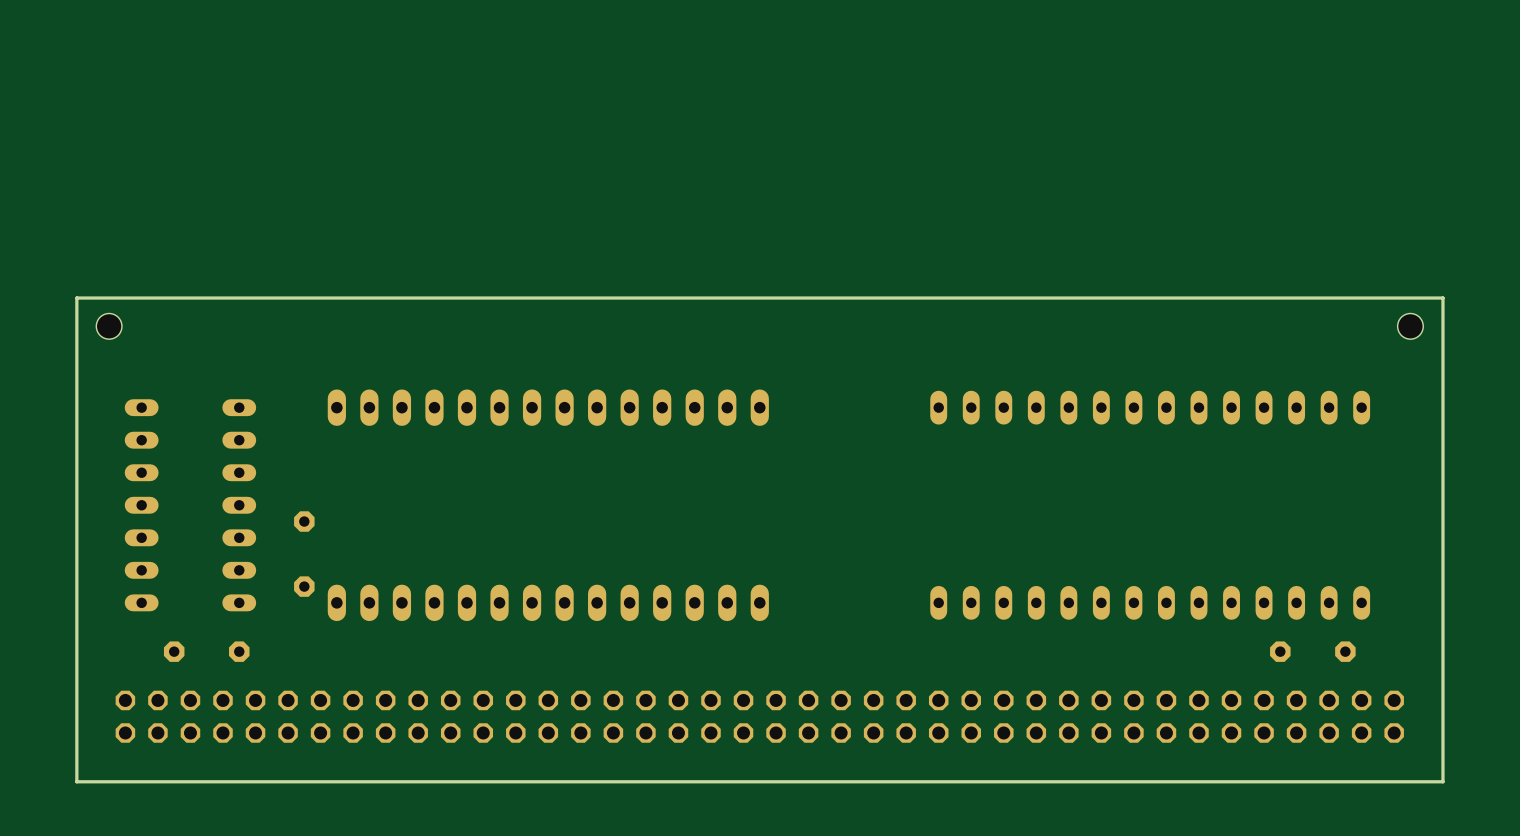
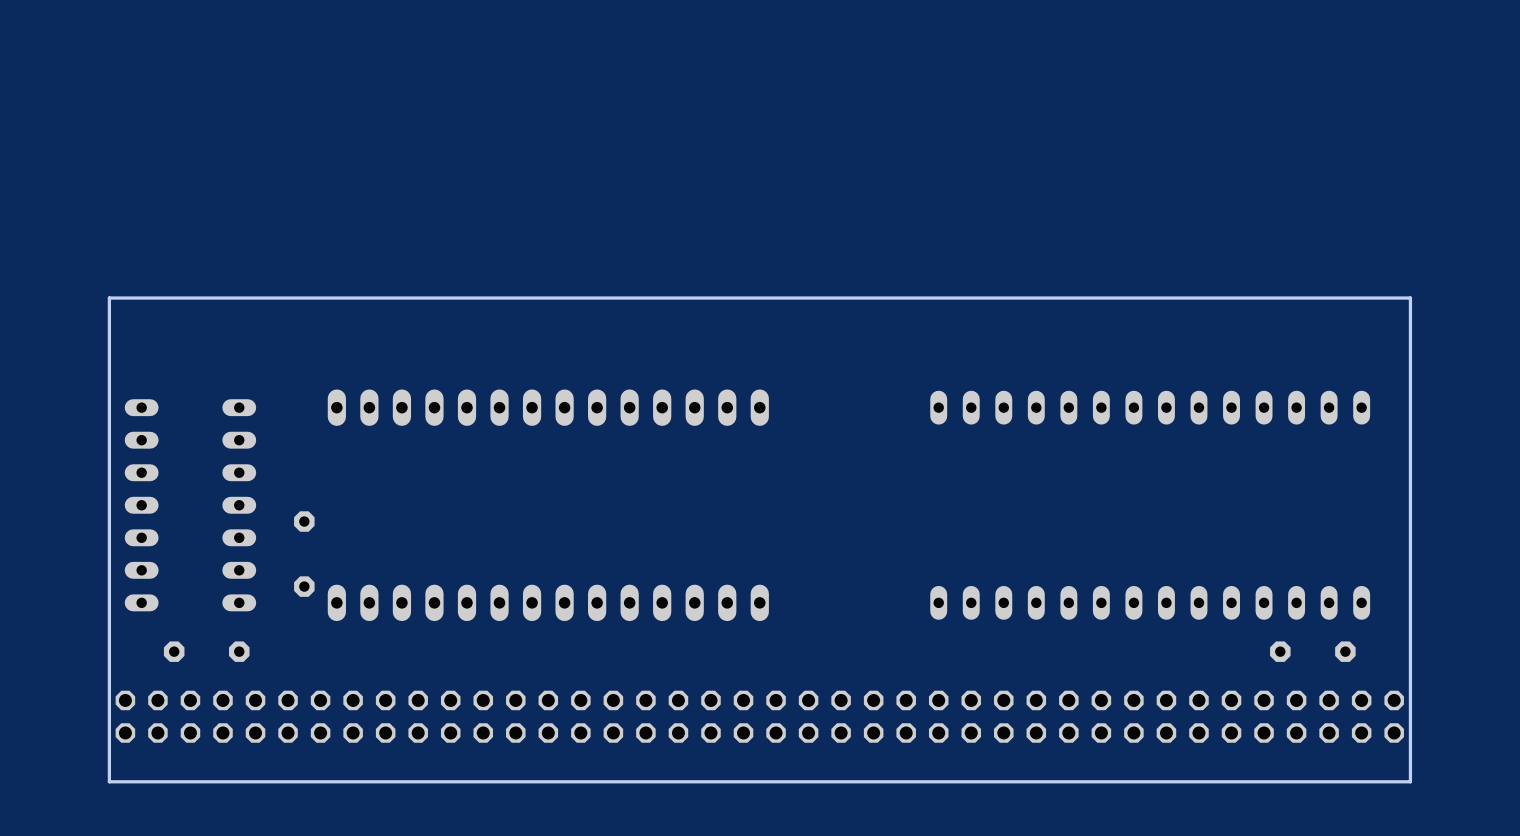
board edge: (109, 298) (76, 298) (76, 781) (109, 781) -> (109, 298) (109, 781)
board edge: (1410, 298) (1442, 298) (1442, 781) (1410, 781) -> (1410, 298) (1410, 781)
hole: (109, 326) -> none
hole: (1410, 326) -> none

